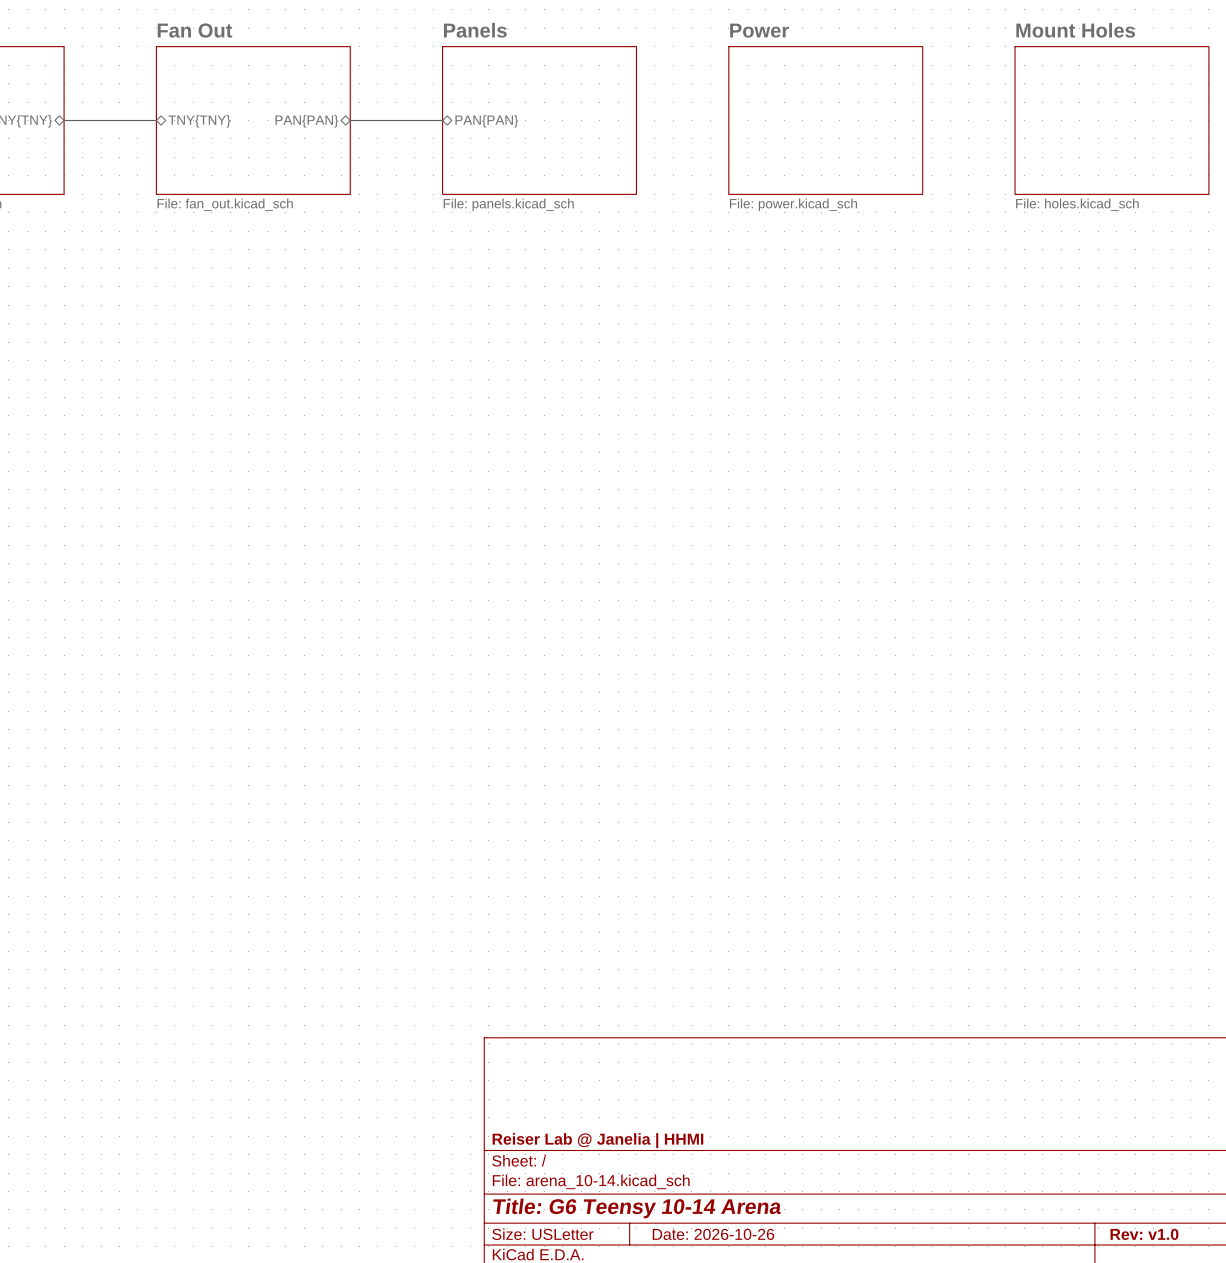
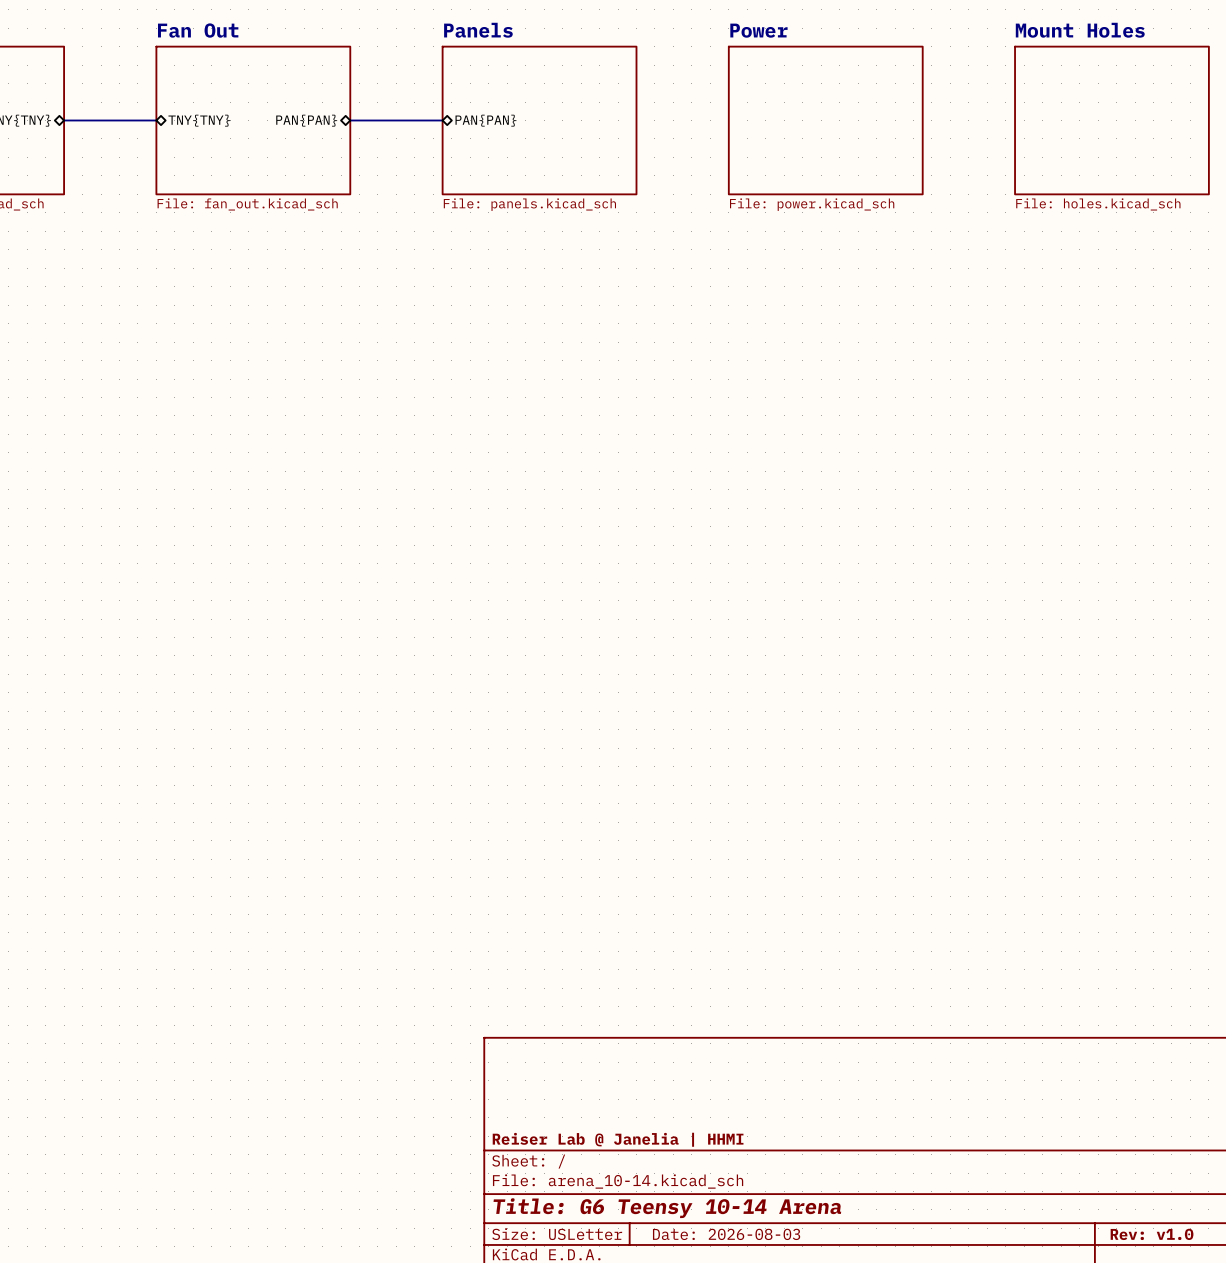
title block: Date: 2026-10-26 (713, 1234) -> Date: 2026-08-03 (726, 1234)

